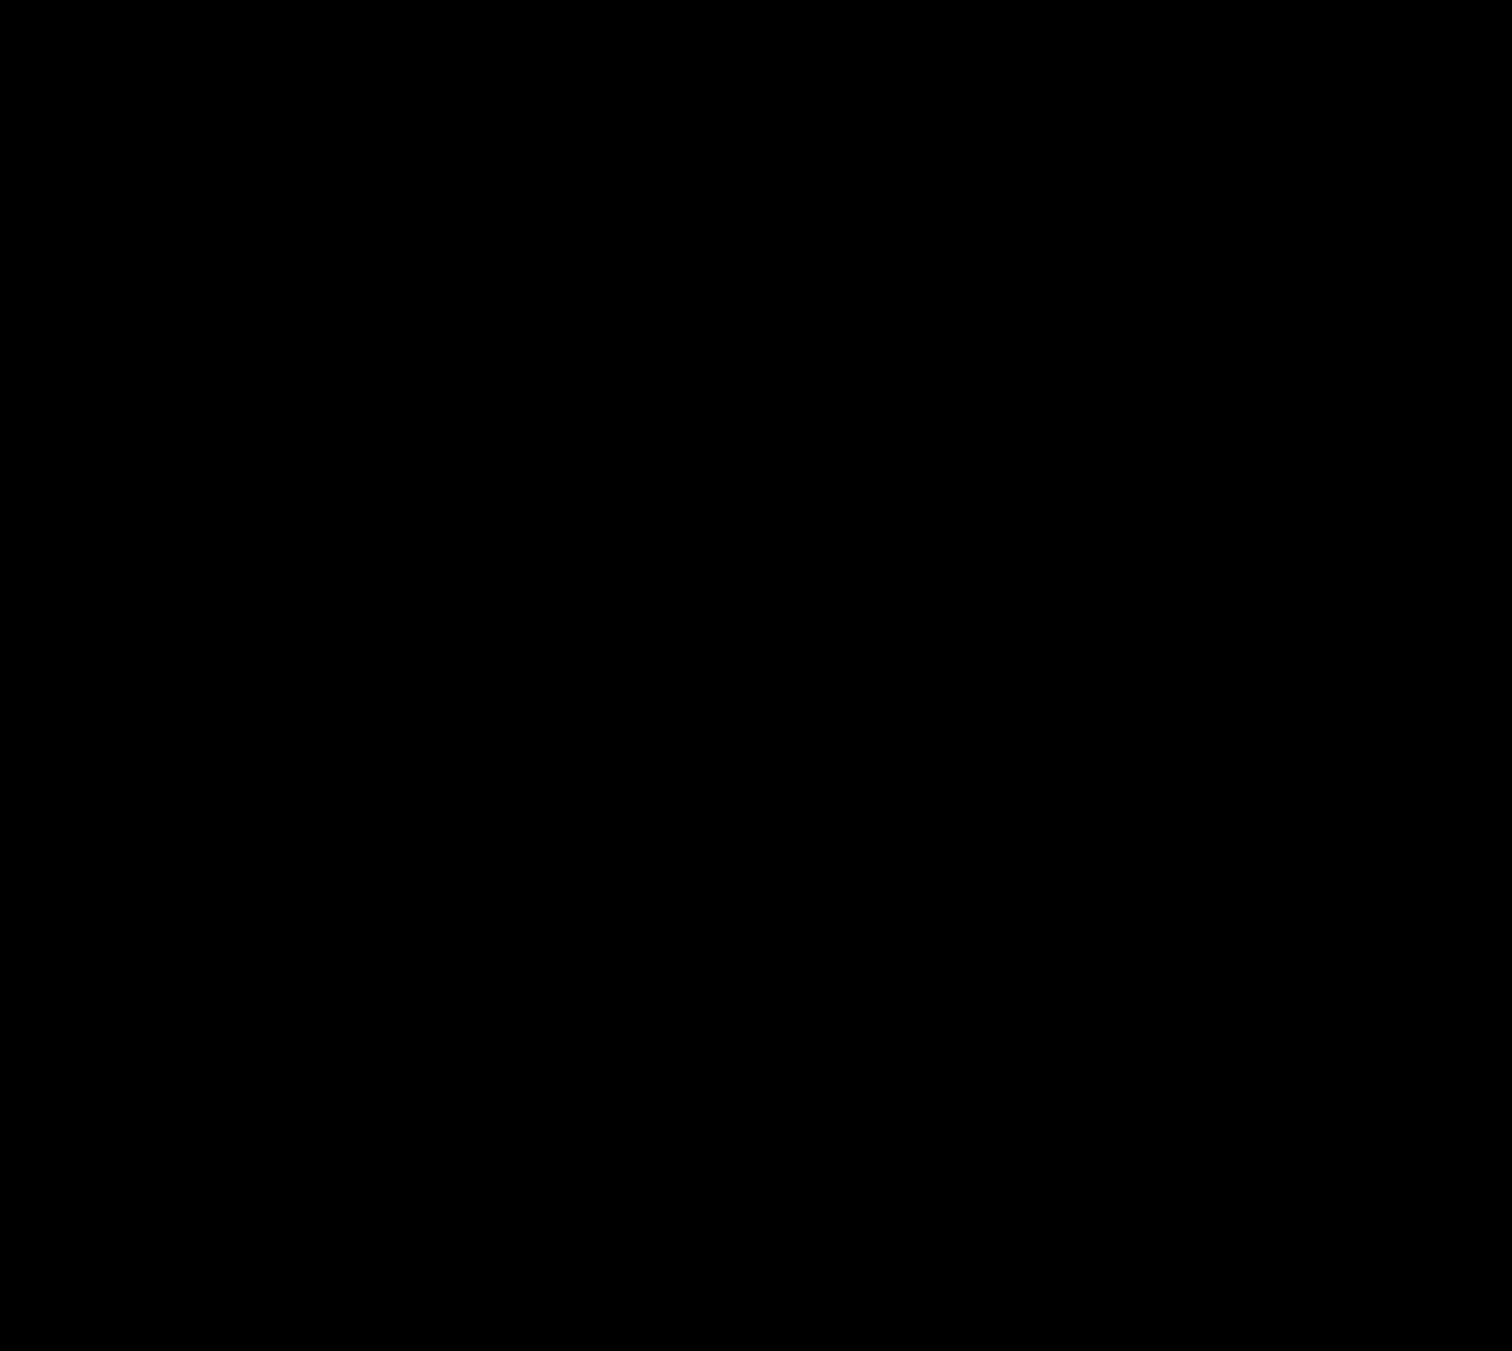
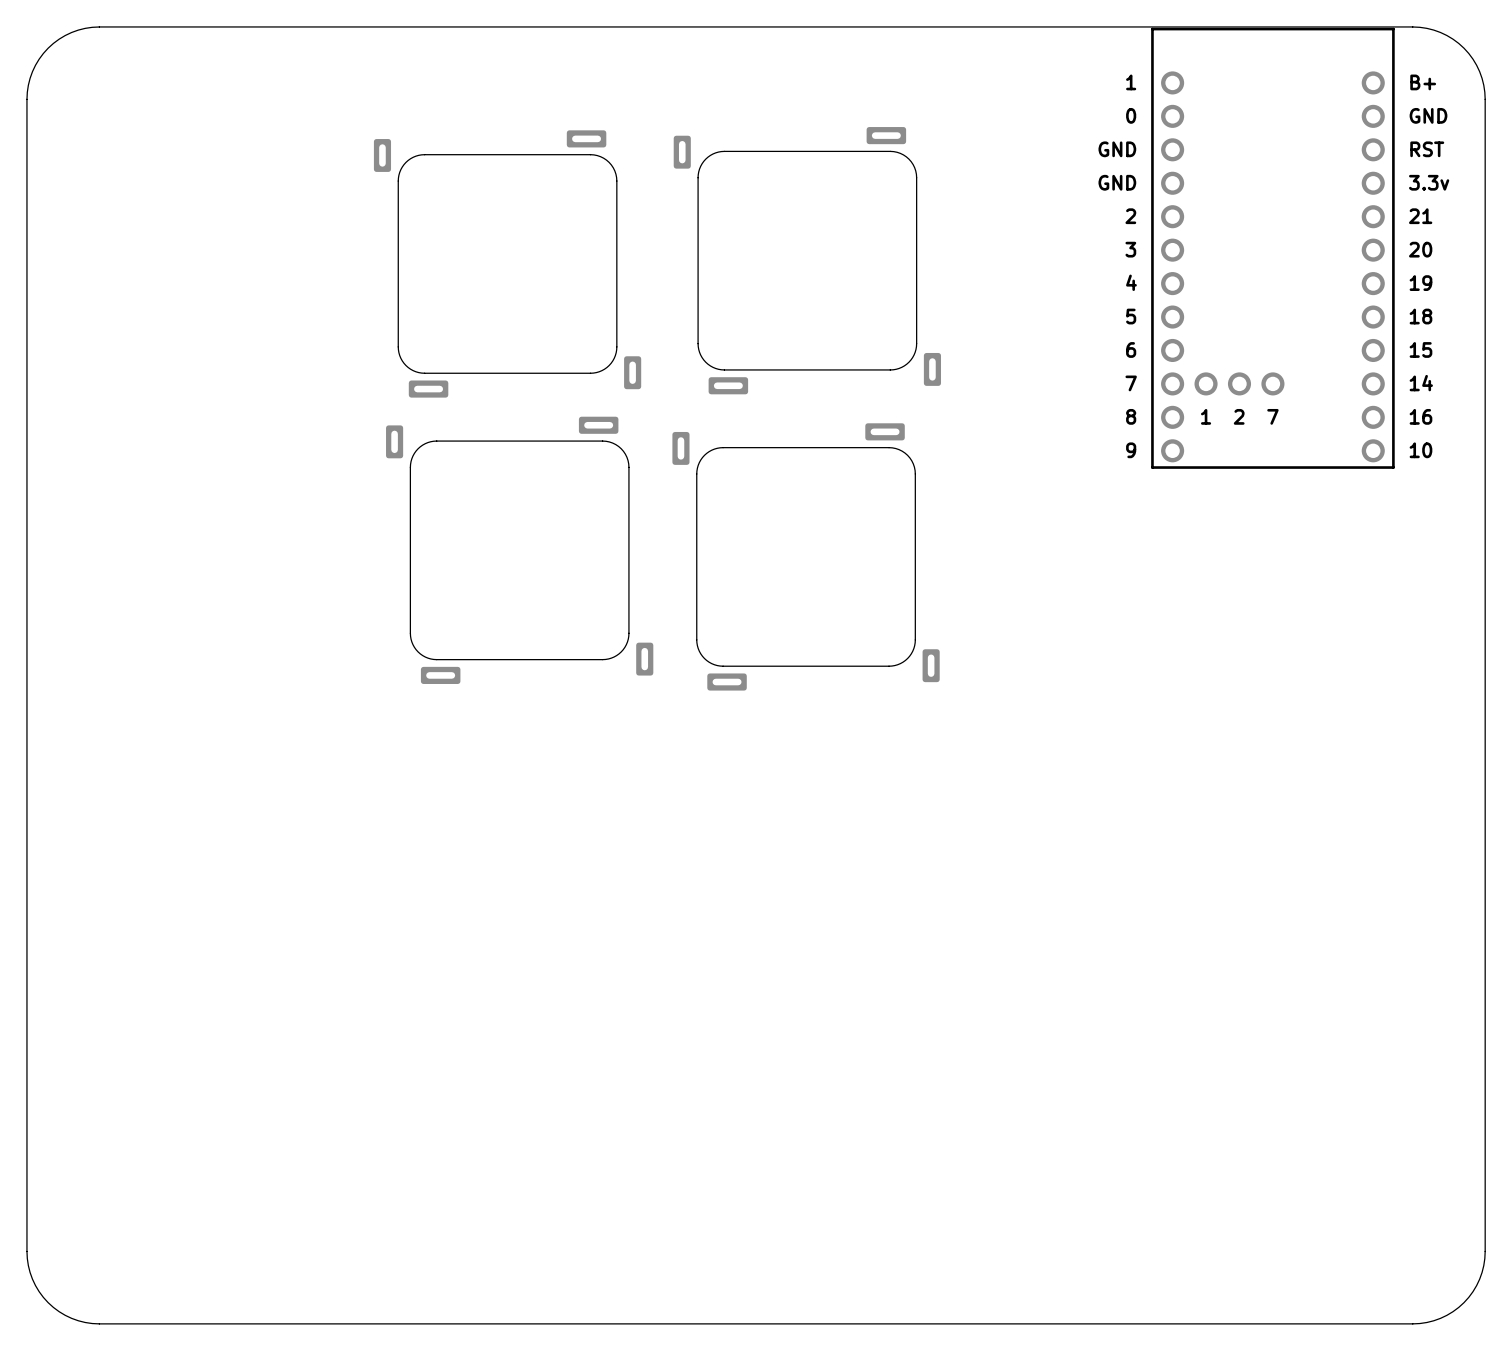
board edge: none -> (99, 26) (1412, 26) (1440, 32) (1463, 48) (1479, 71) (1485, 99) (1485, 1251) (1479, 1279) (1463, 1302) (1440, 1318) (1412, 1323) (99, 1323) (71, 1318) (48, 1302) (32, 1279) (26, 1251) (26, 99) (32, 71) (48, 48) (71, 32) (99, 26)
part: none -> (1272, 248)
part: none -> (807, 260)
part: none -> (507, 263)
part: none -> (519, 550)
part: none -> (806, 556)

